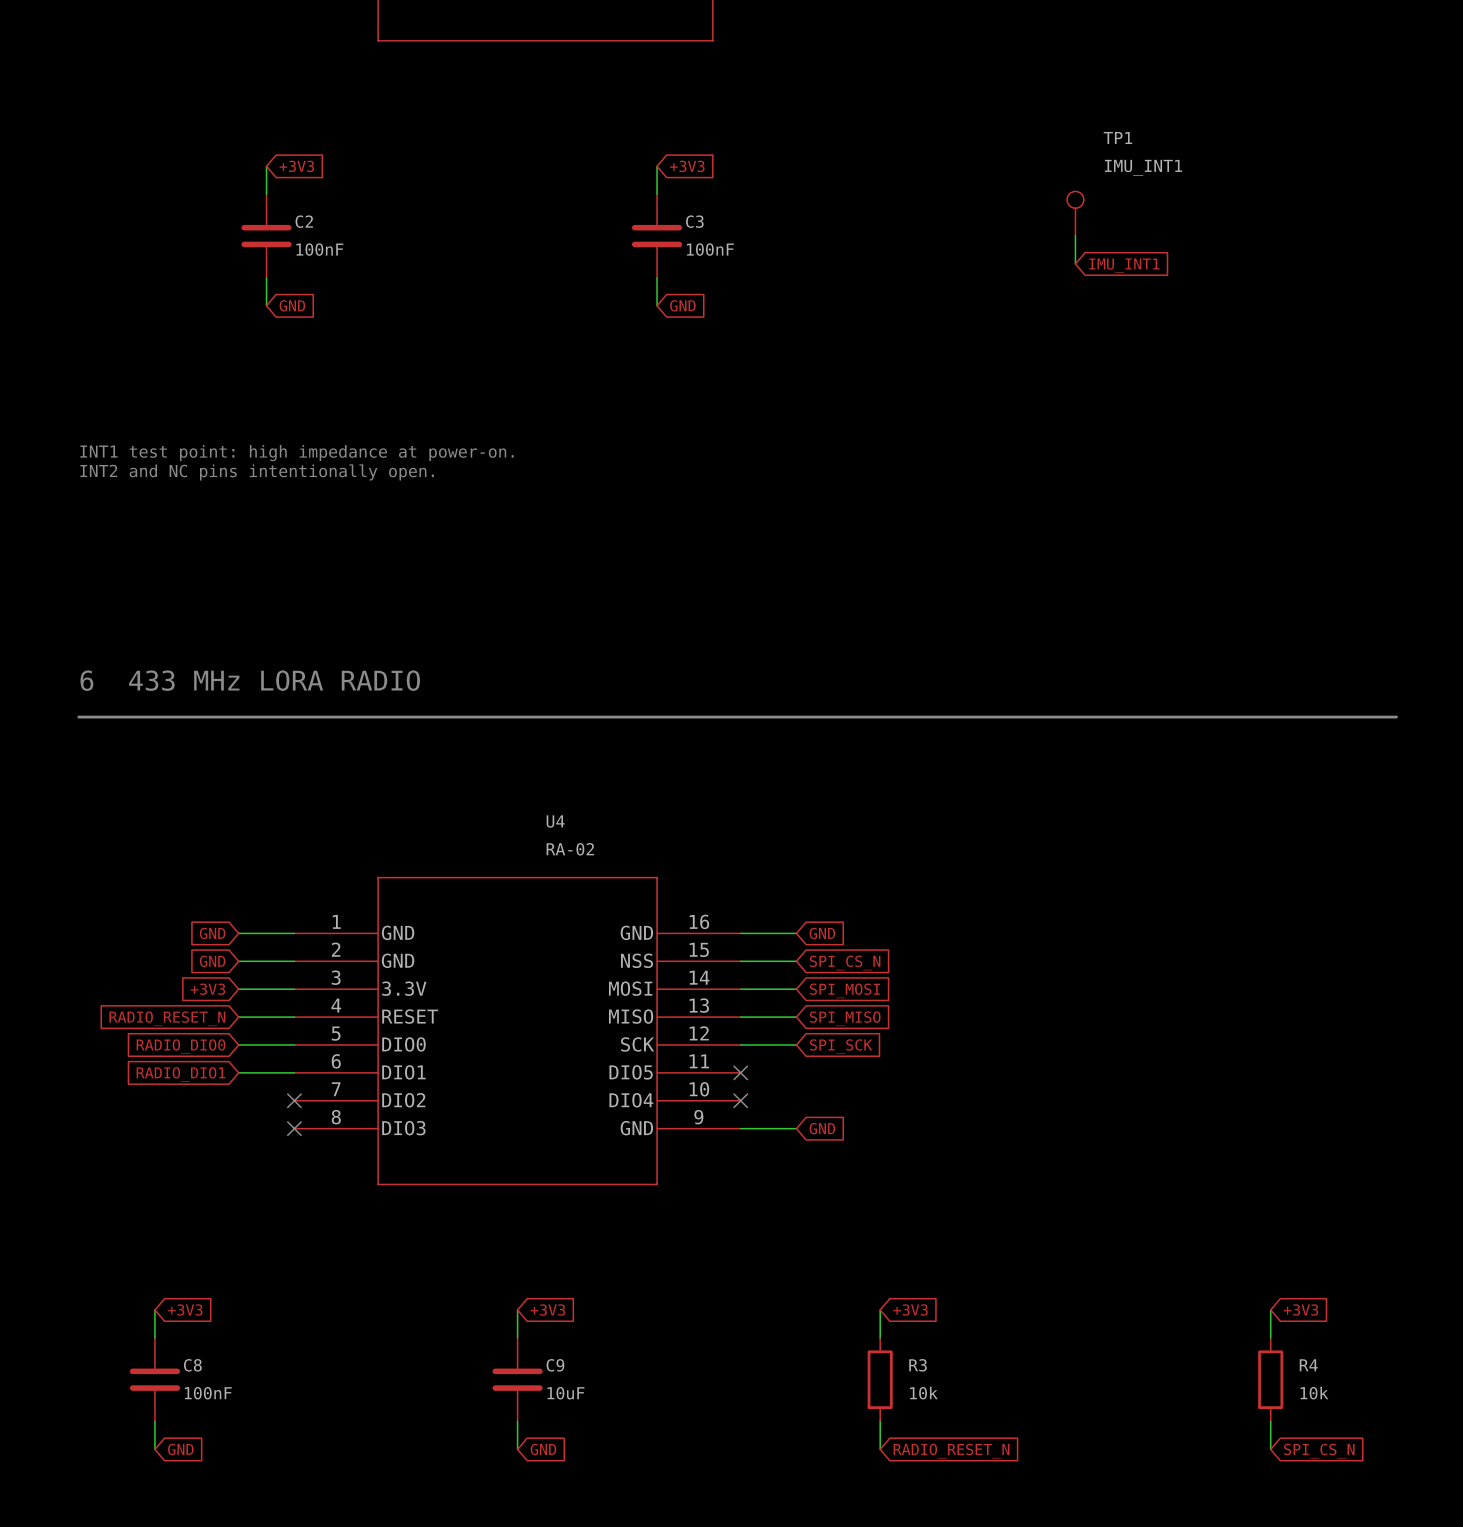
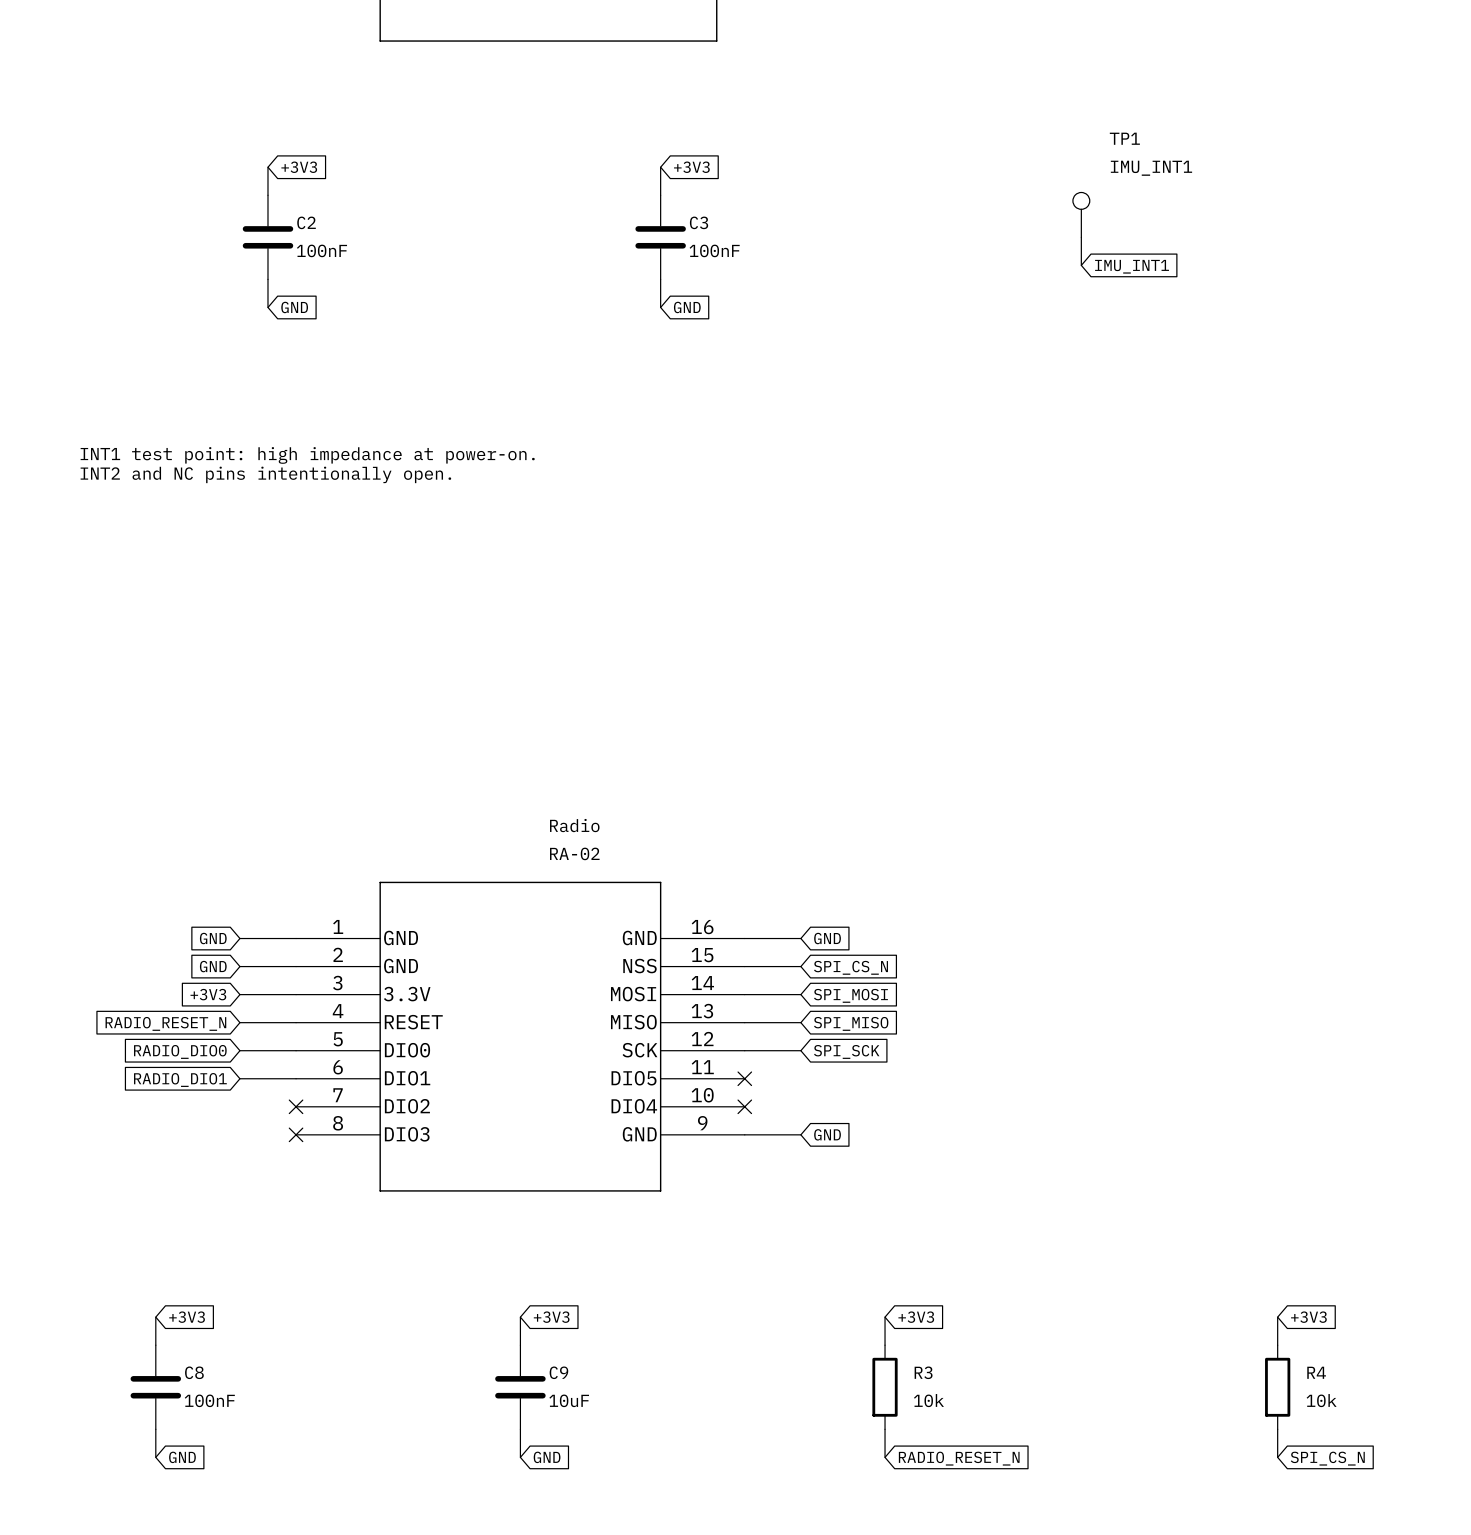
text: 6 433 MHz LORA RADIO (250, 680) -> none
line: (78, 717) (1396, 717) -> none
U4 name: U4 (555, 821) -> Radio (574, 825)

